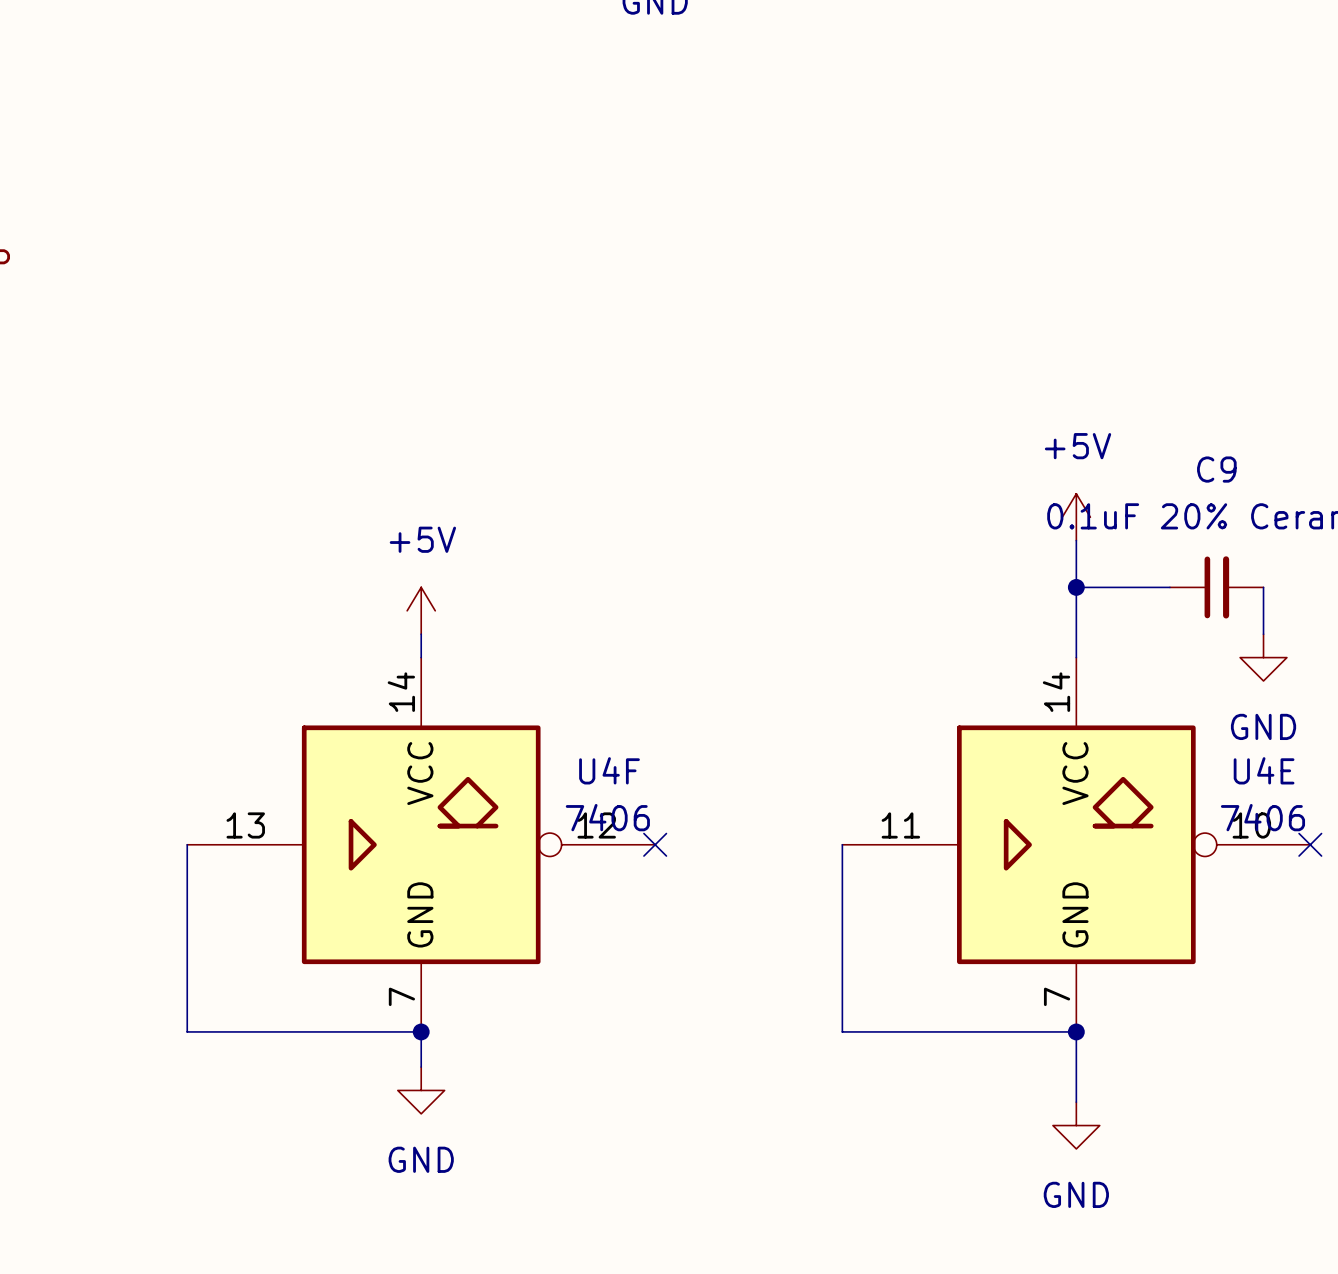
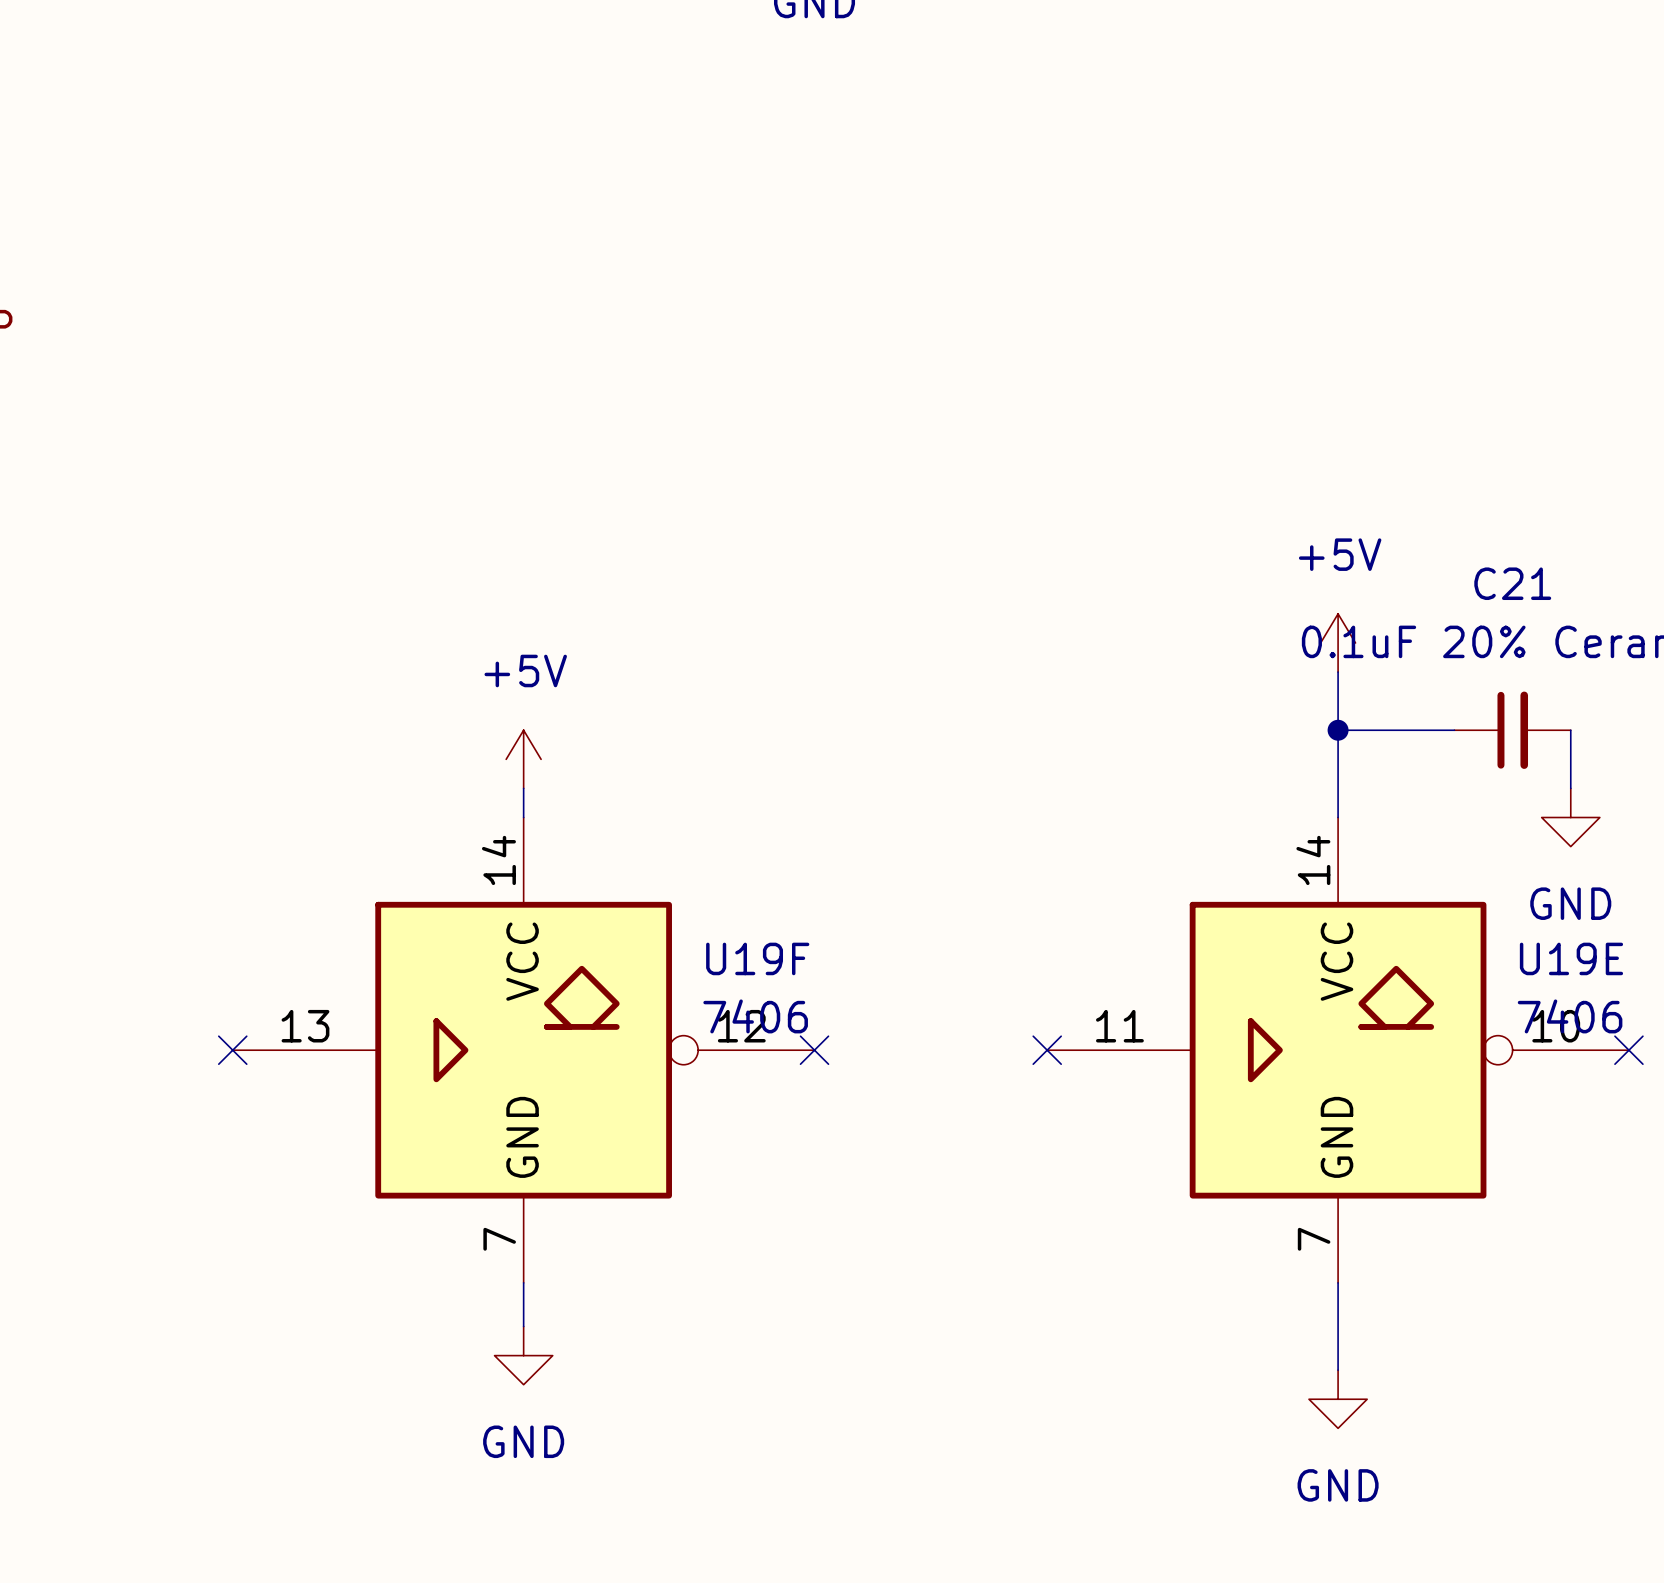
C9 name: C9 (1216, 469) -> C21 (1512, 583)
U4F name: U4F (609, 770) -> U19F (757, 958)
U4E name: U4E (1264, 770) -> U19E (1571, 958)
wire: (187, 844) (187, 1031) (421, 1031) -> none
no-connect mark: none -> (232, 1050)
wire: (842, 844) (842, 1031) (1076, 1031) -> none
no-connect mark: none -> (1047, 1050)
junction: (421, 1031) -> none
junction: (1076, 1031) -> none

